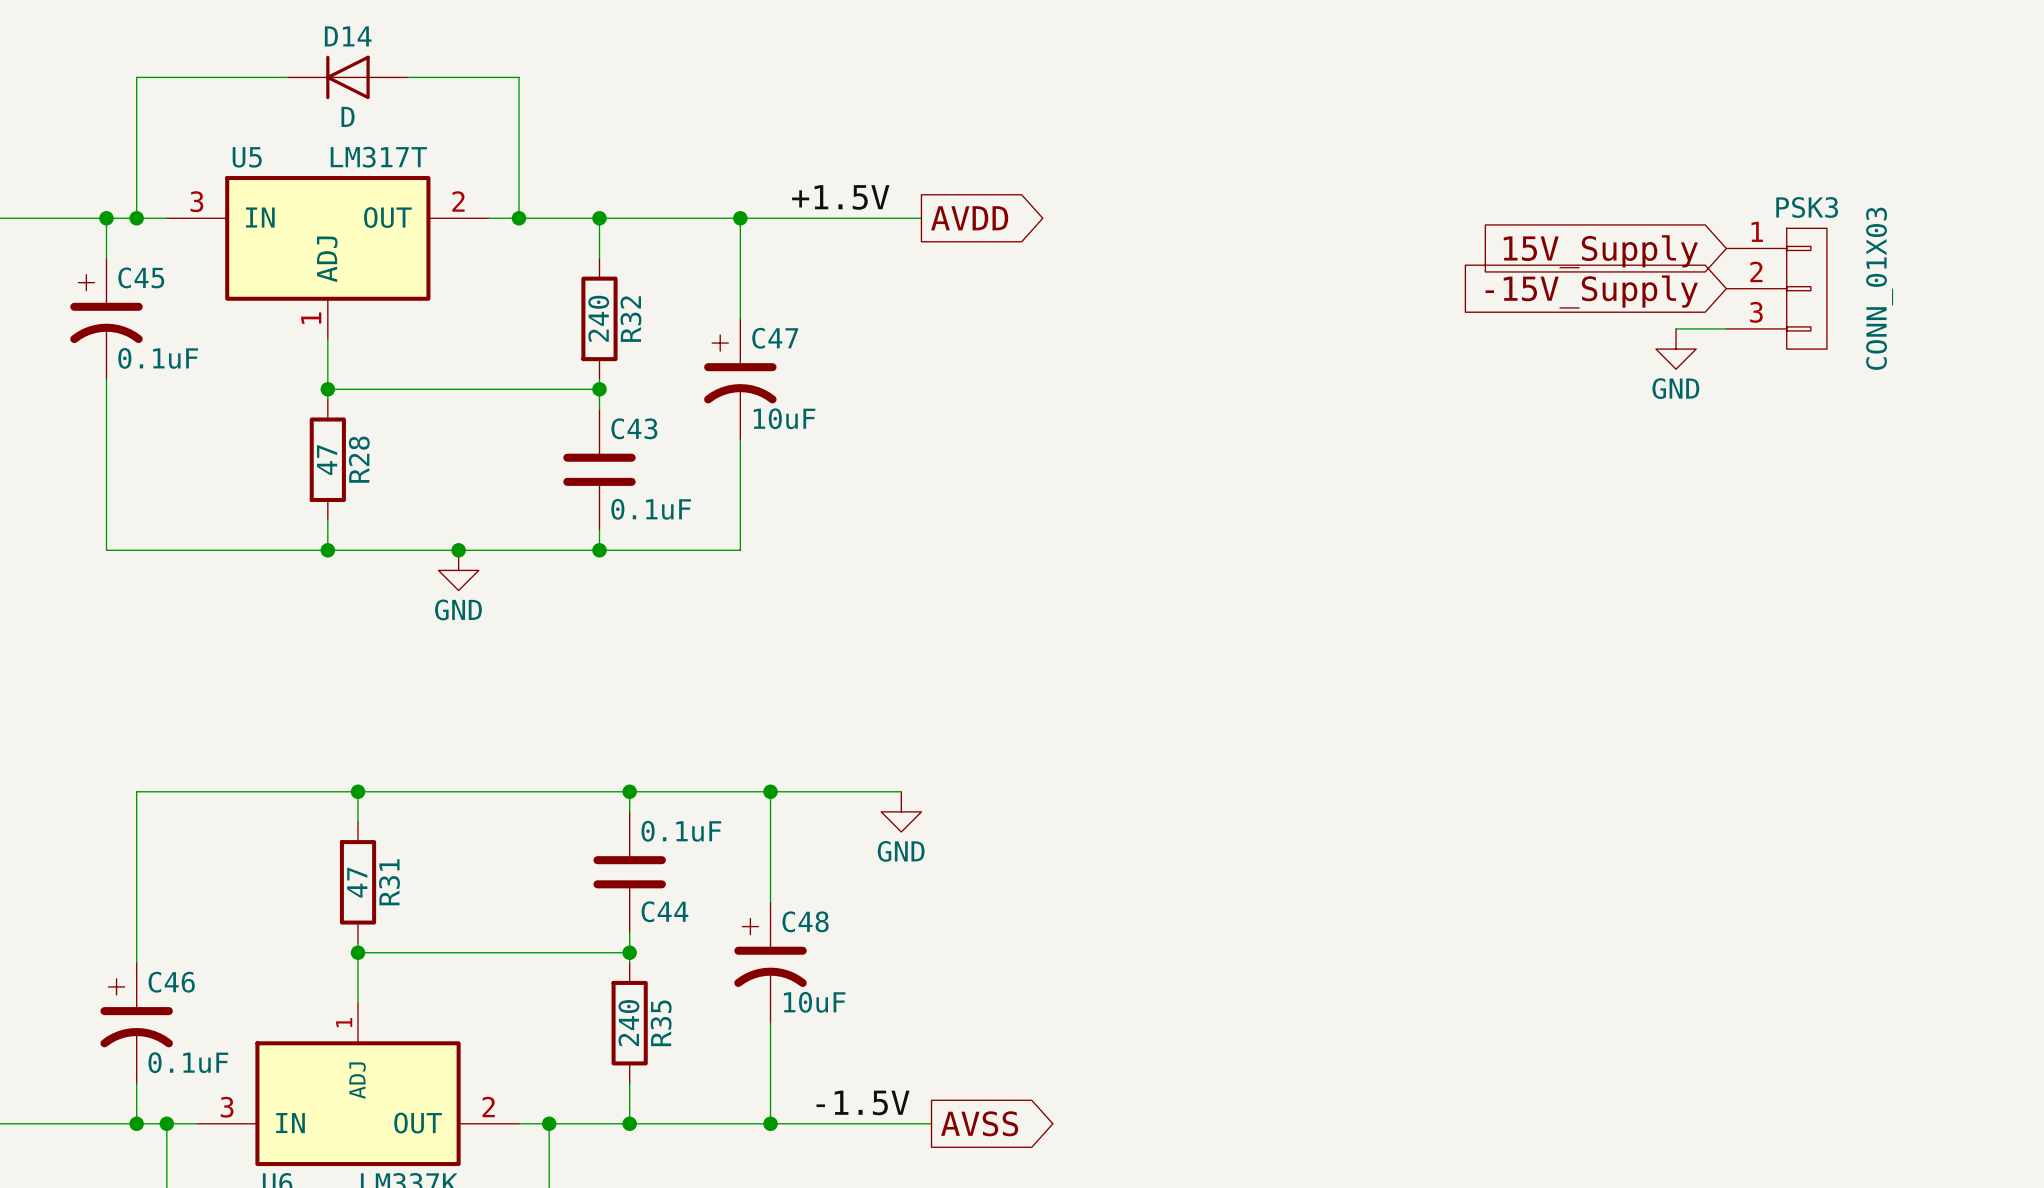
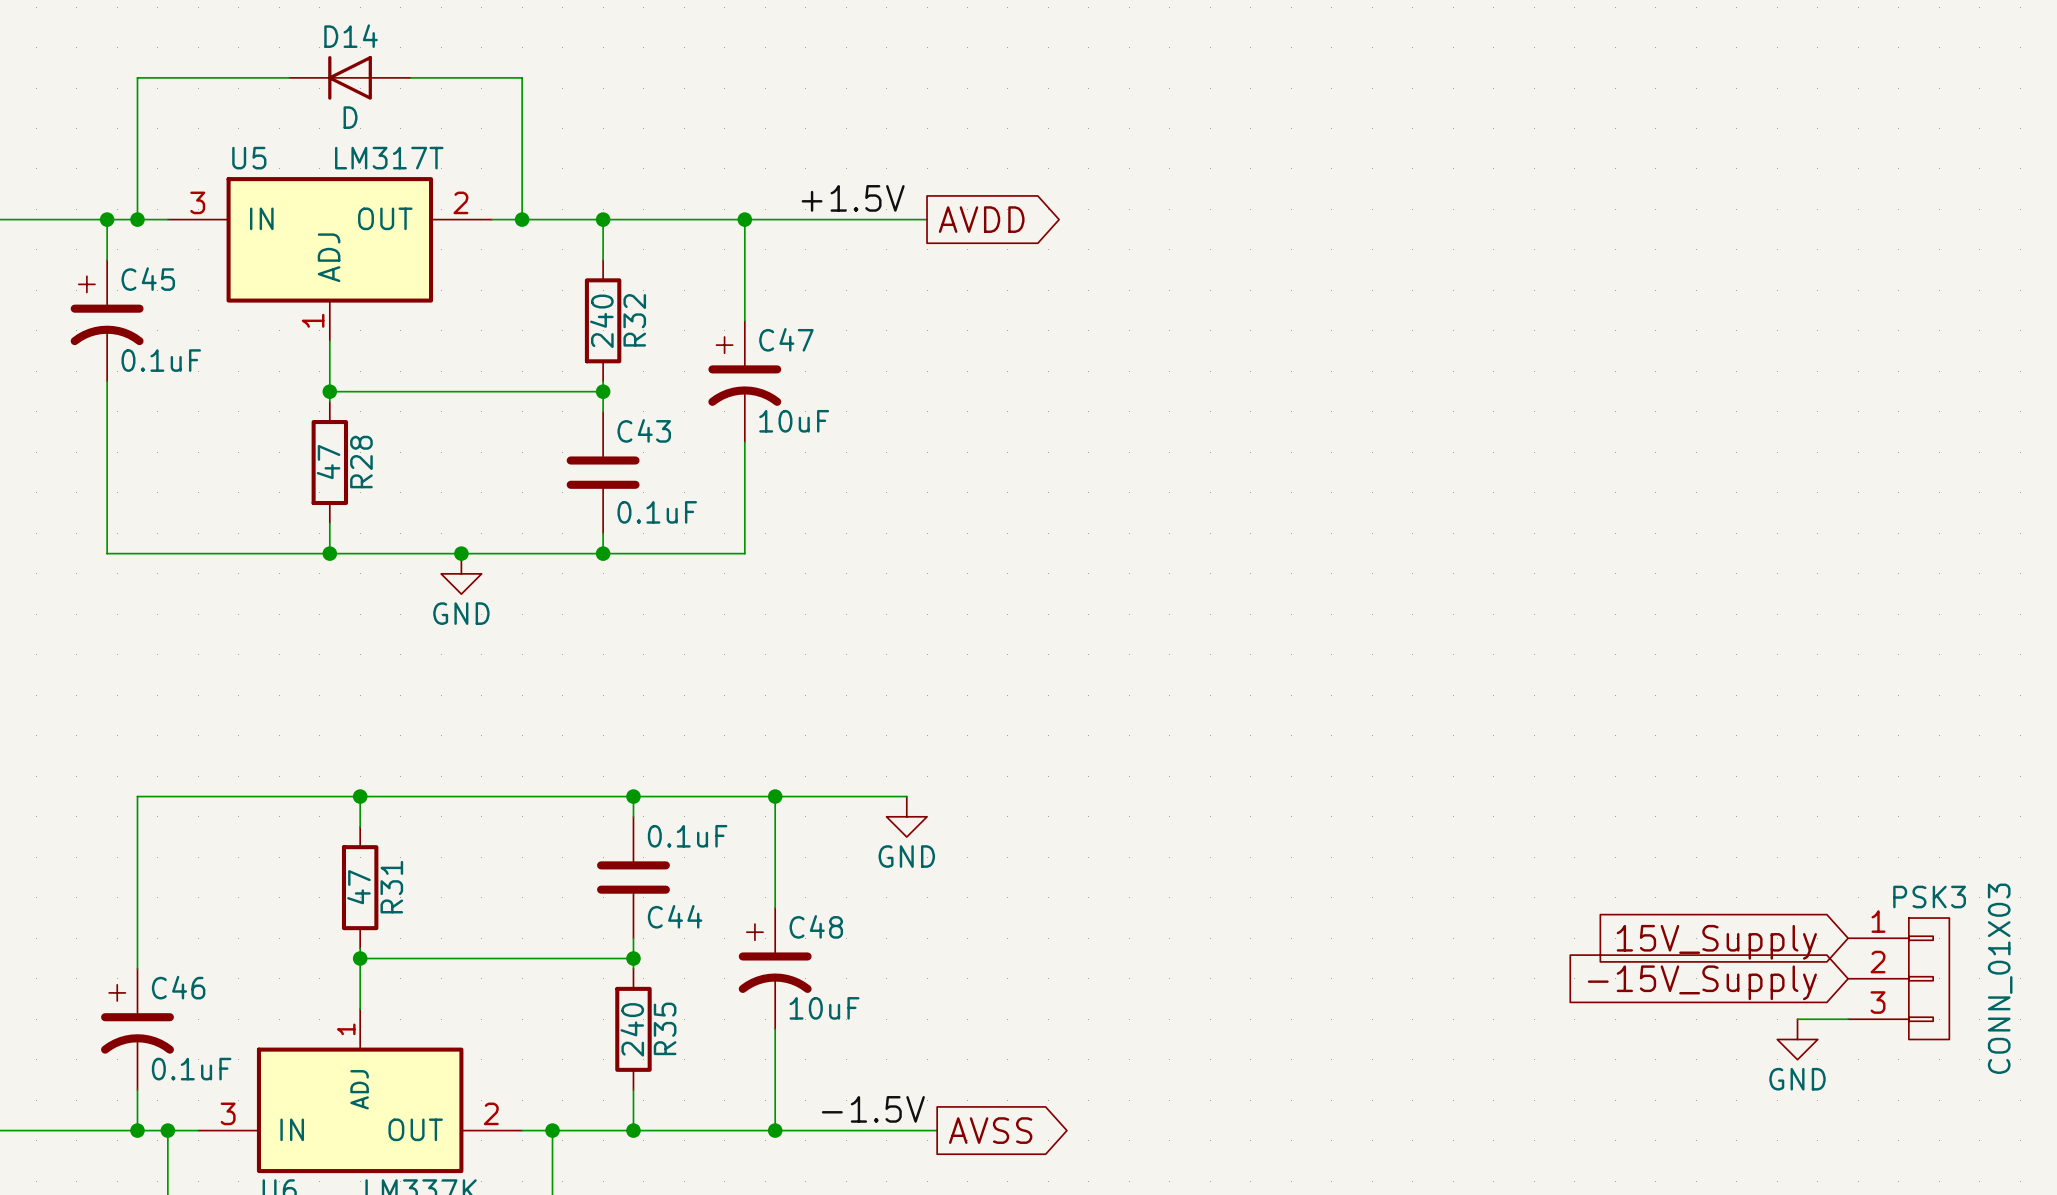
global label: 15V_Supply (1600, 251) -> none
PSK3 position: (1776, 288) -> (1898, 978)
global label: -15V_Supply (1591, 292) -> none
wire: (1676, 328) (1726, 328) -> none
power symbol: GND (1676, 349) -> none
global label: none -> 15V_Supply (1716, 942)
global label: none -> -15V_Supply (1702, 982)
wire: none -> (1797, 1019) (1848, 1019)
power symbol: none -> GND (1797, 1039)

